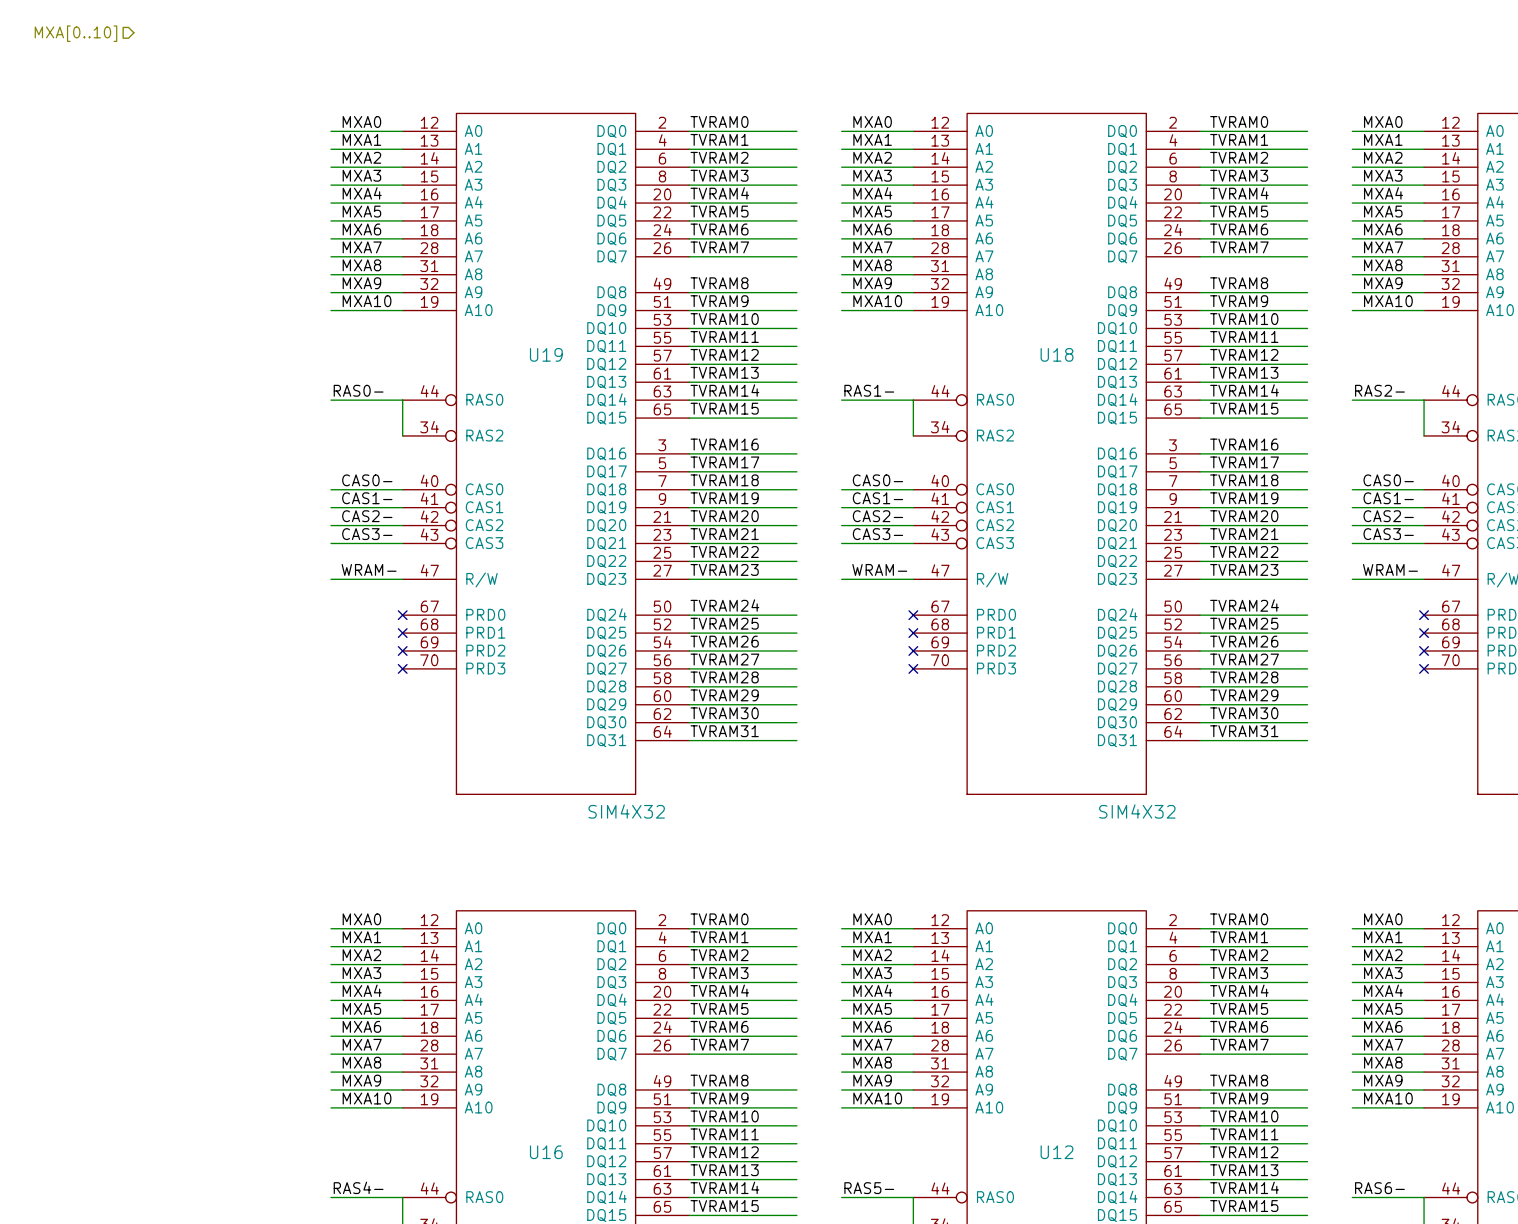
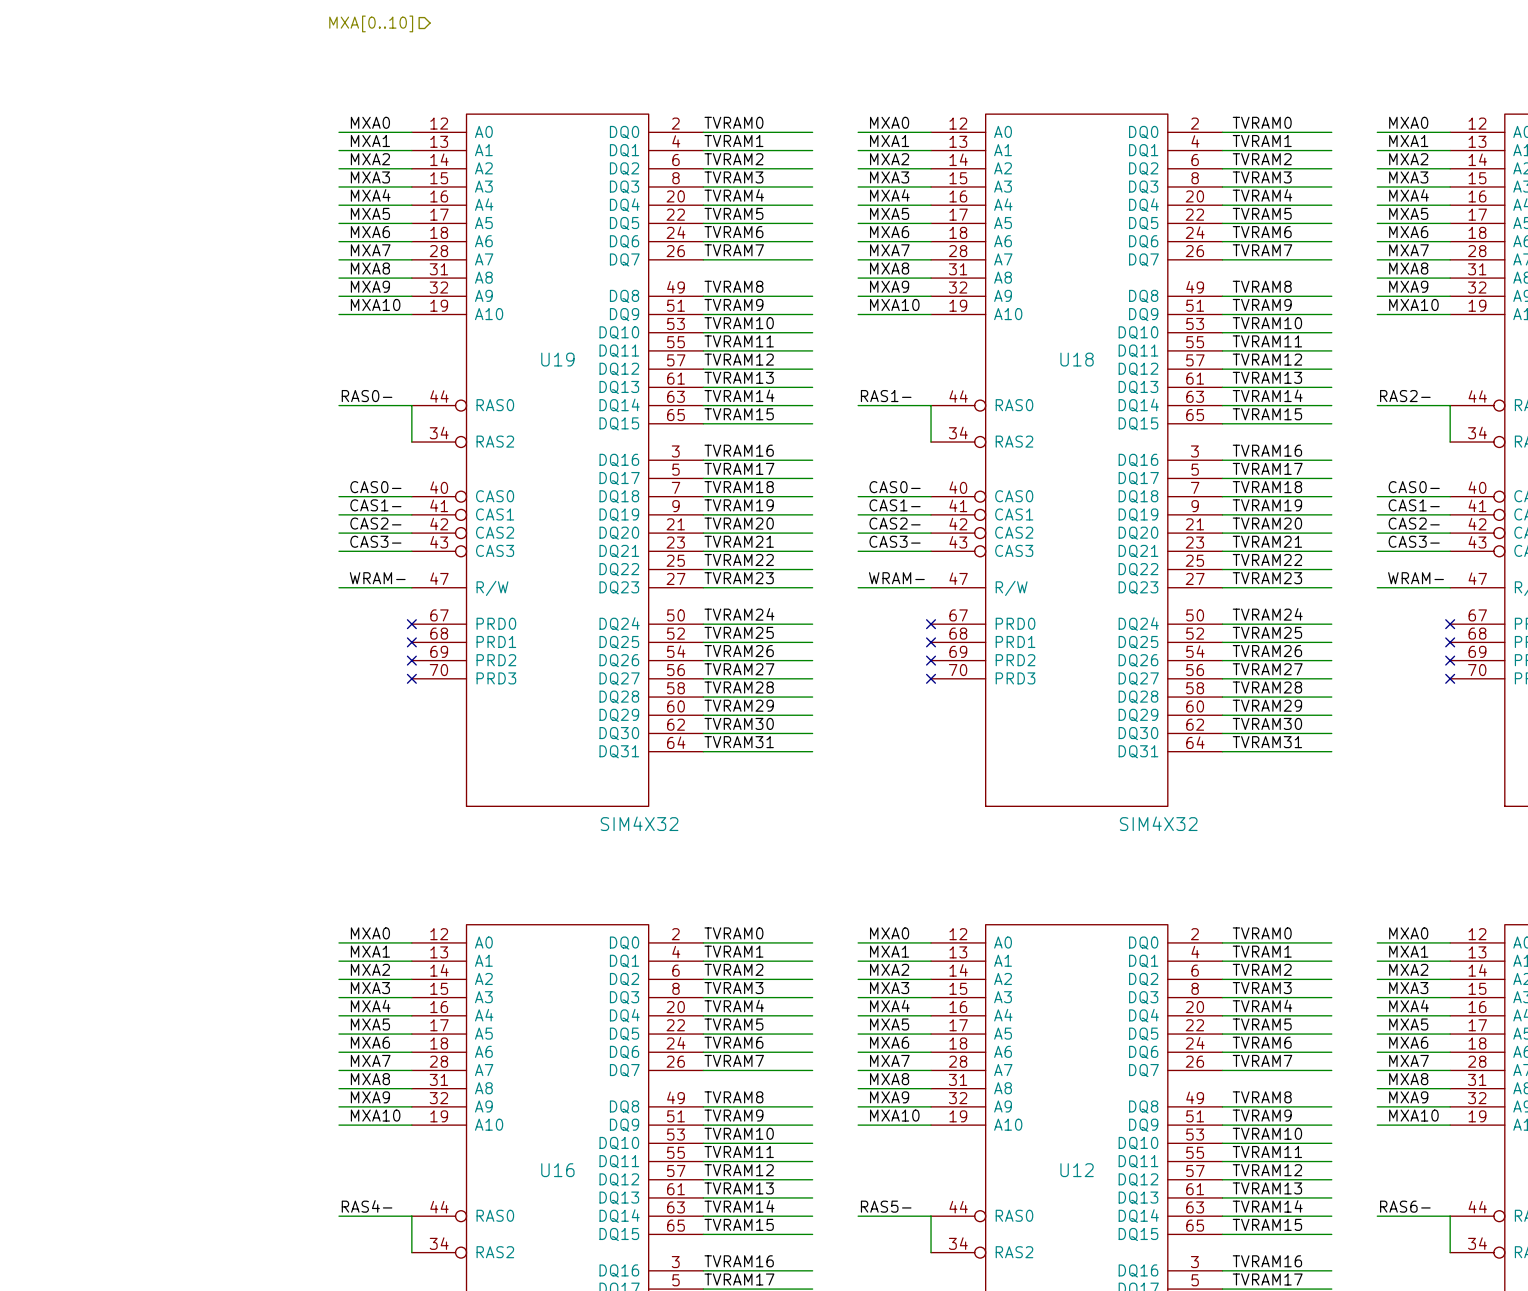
hierarchical label: none -> MXA[0..10] (371, 23)
hierarchical label: MXA[0..10] (75, 33) -> none

